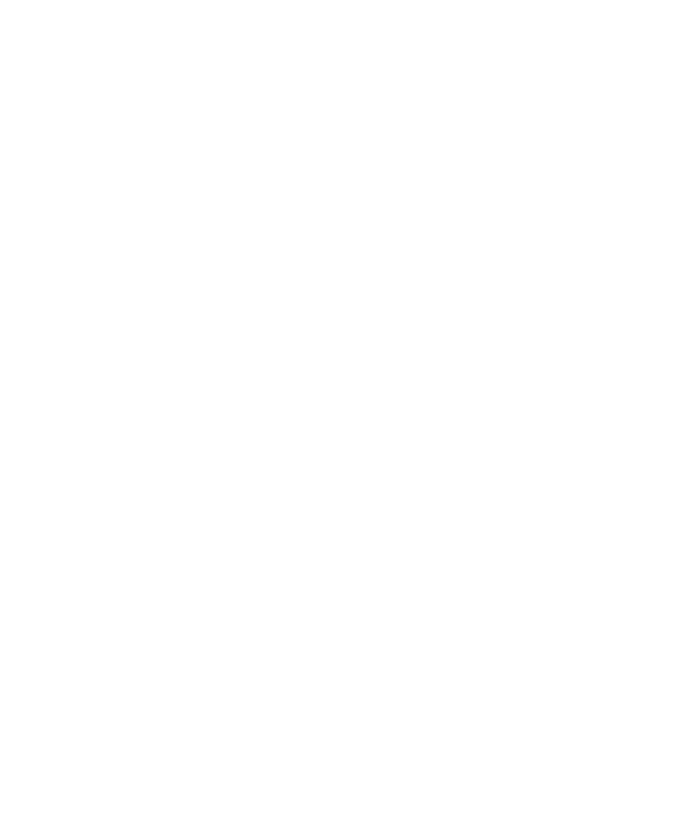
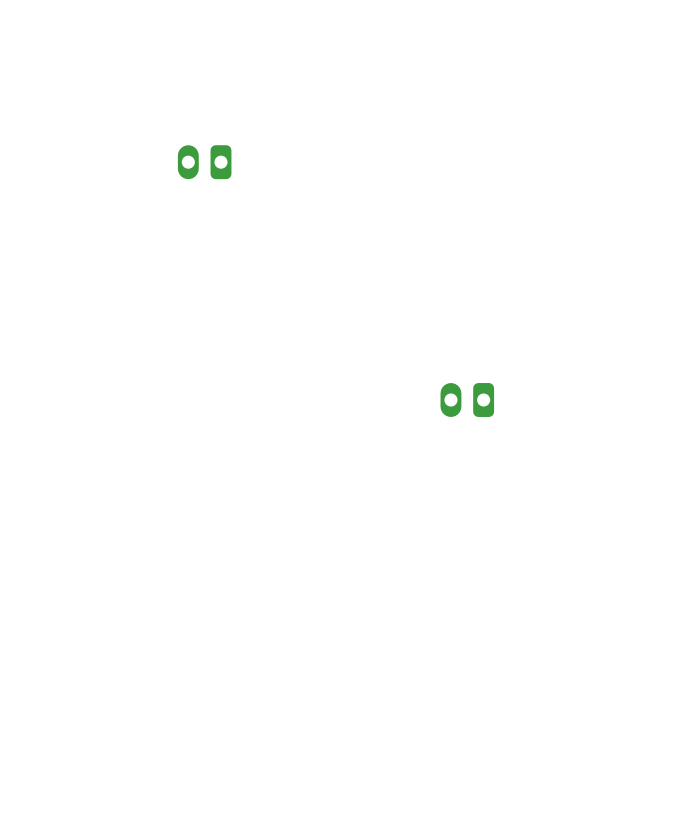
part: none -> (204, 162)
part: none -> (467, 400)

